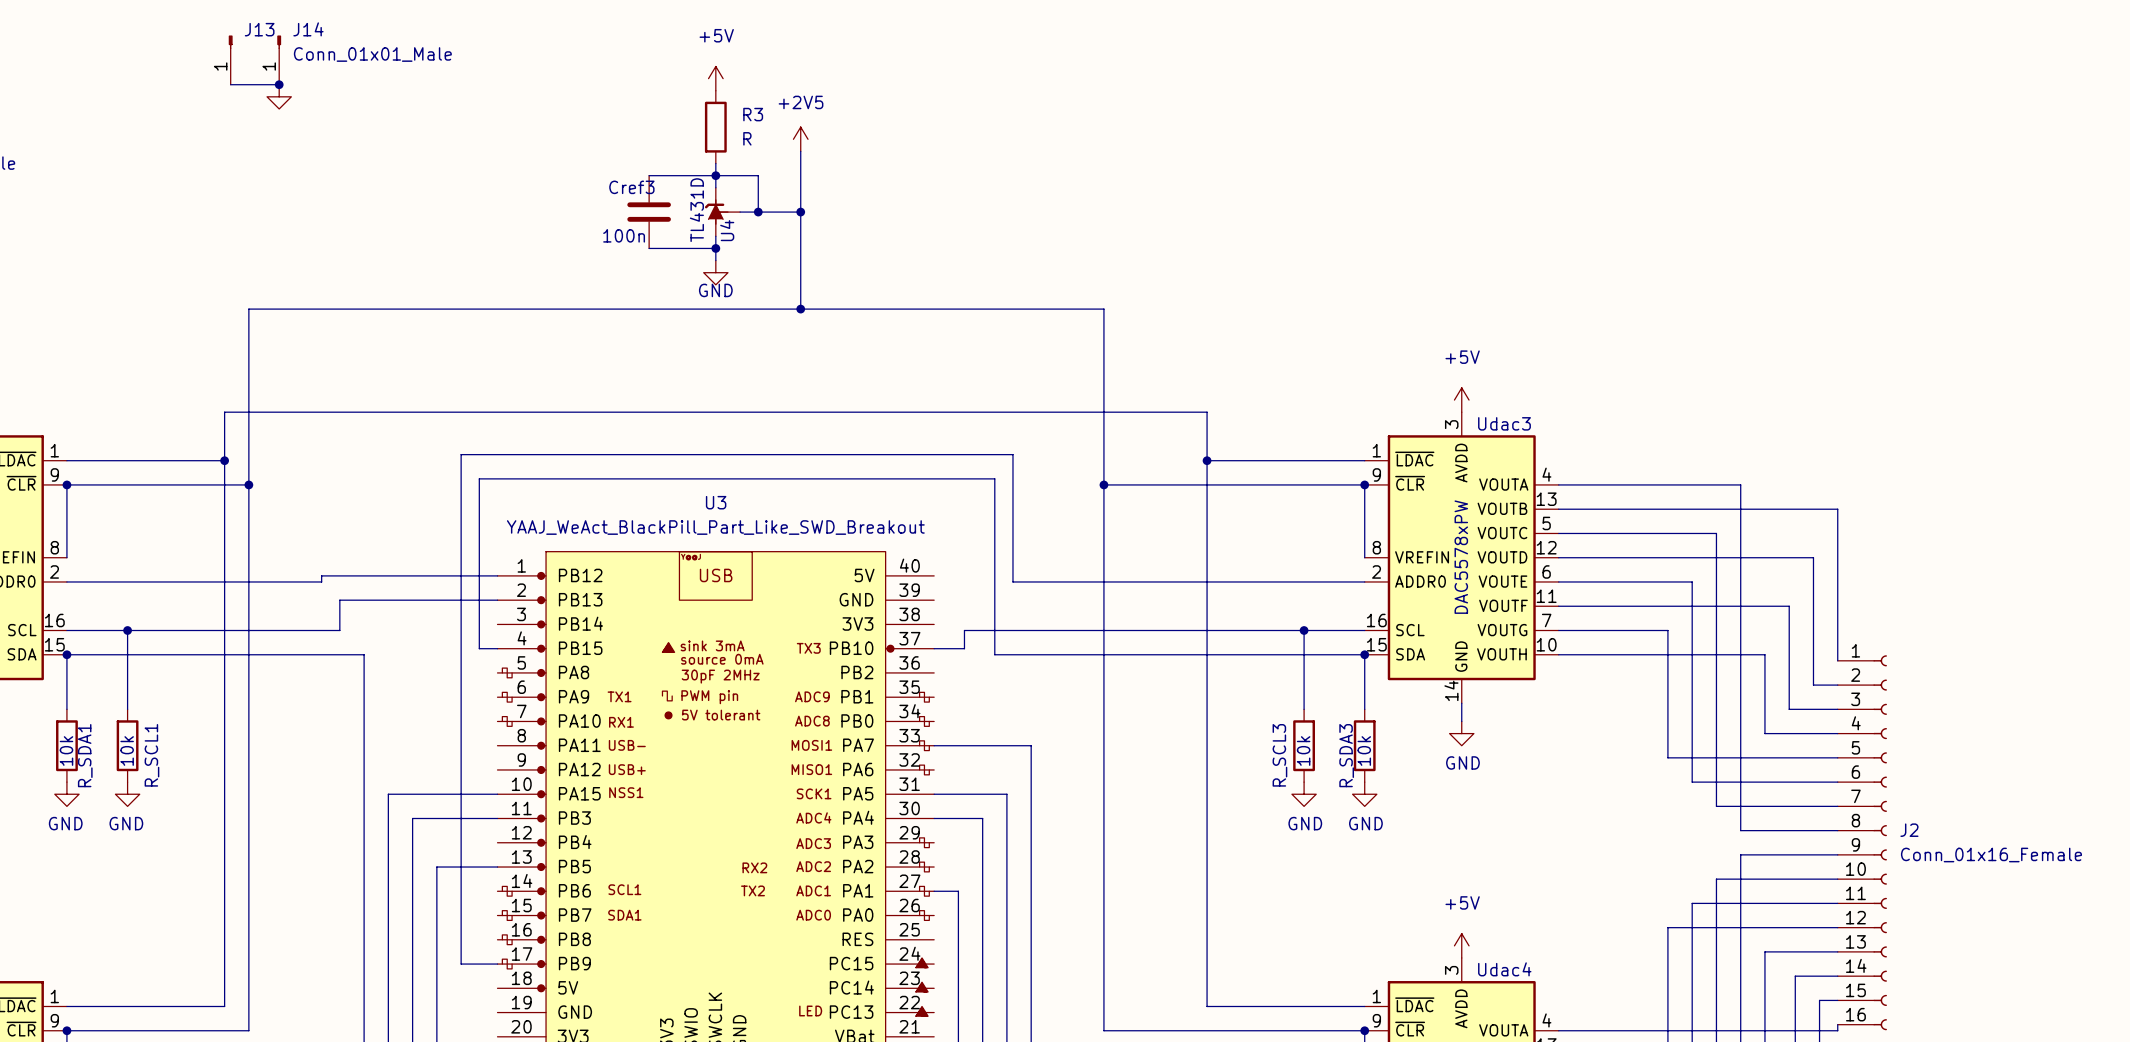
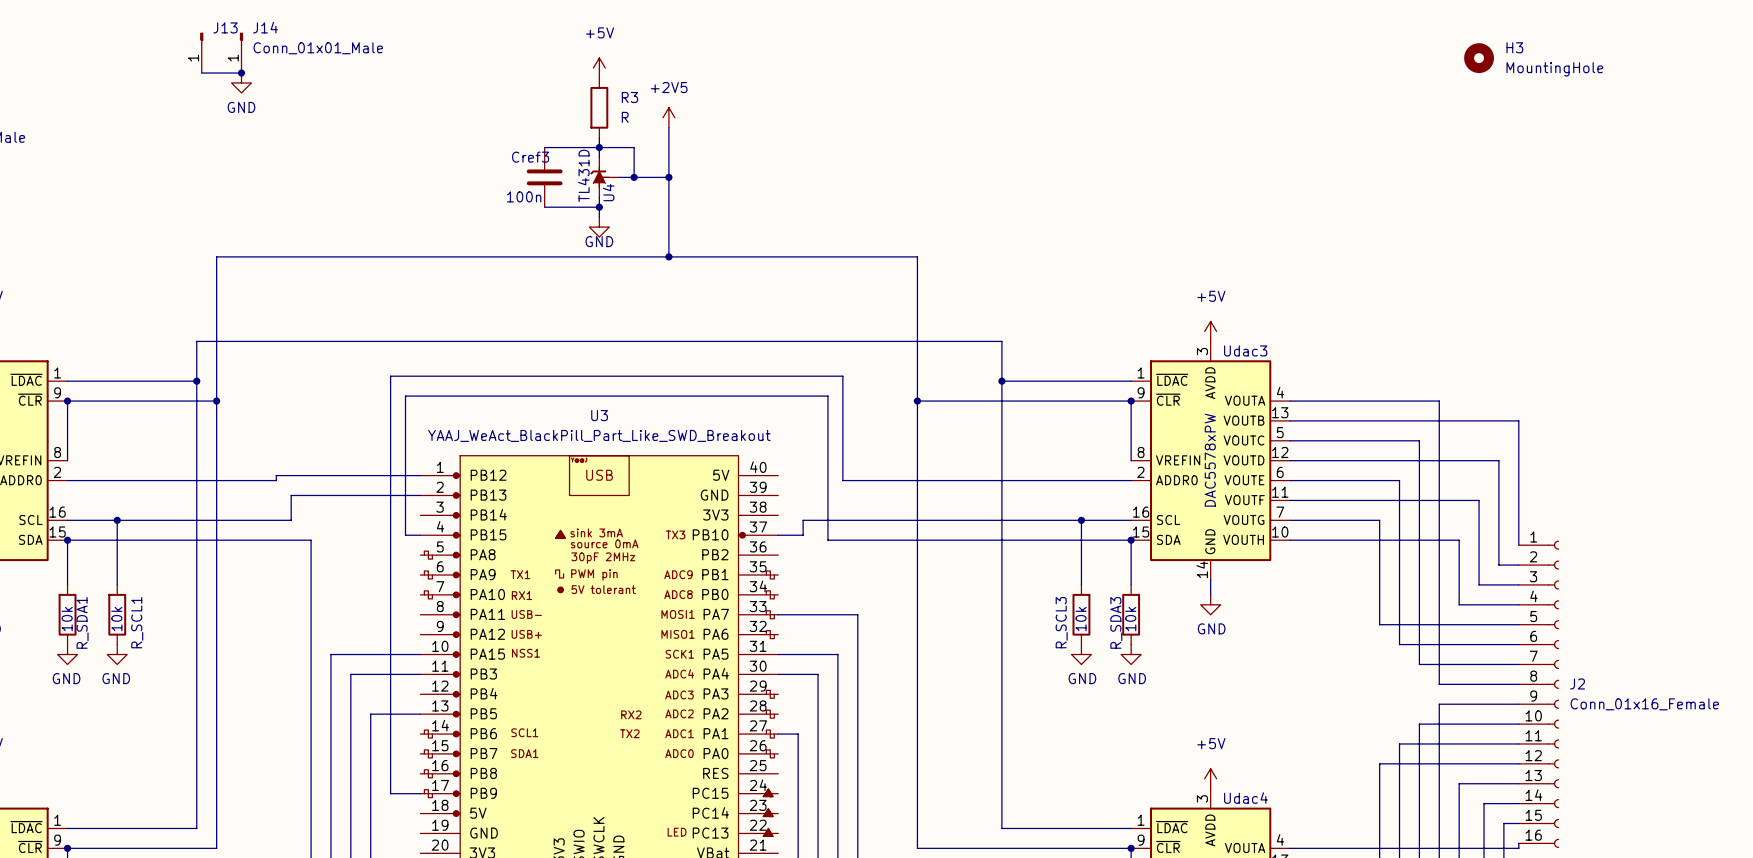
H3: none -> MountingHole (1479, 58)
power symbol text: none -> GND (241, 107)

